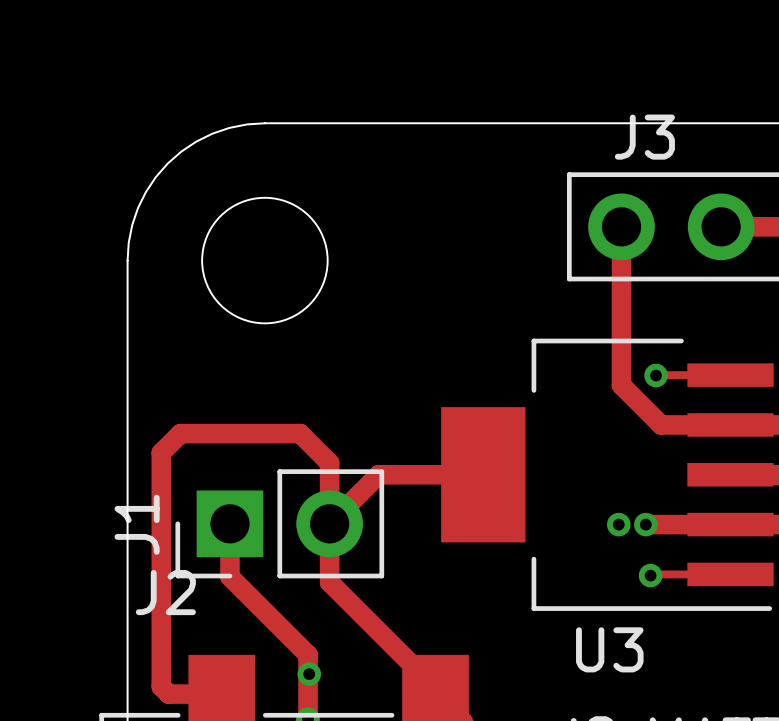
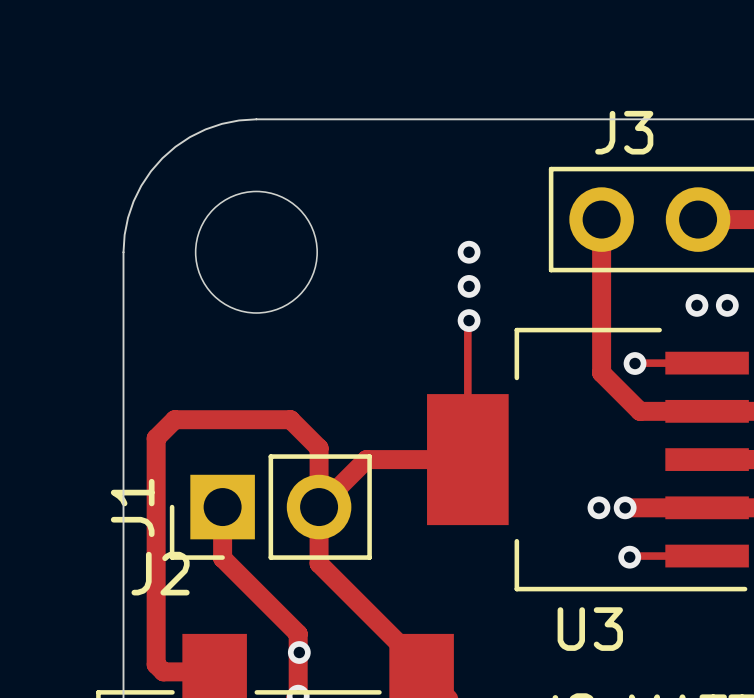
via: none -> (469, 252)
via: none -> (469, 286)
via: none -> (696, 305)
via: none -> (727, 305)
track: none -> (469, 320) (467, 459)
via: none -> (469, 320)

